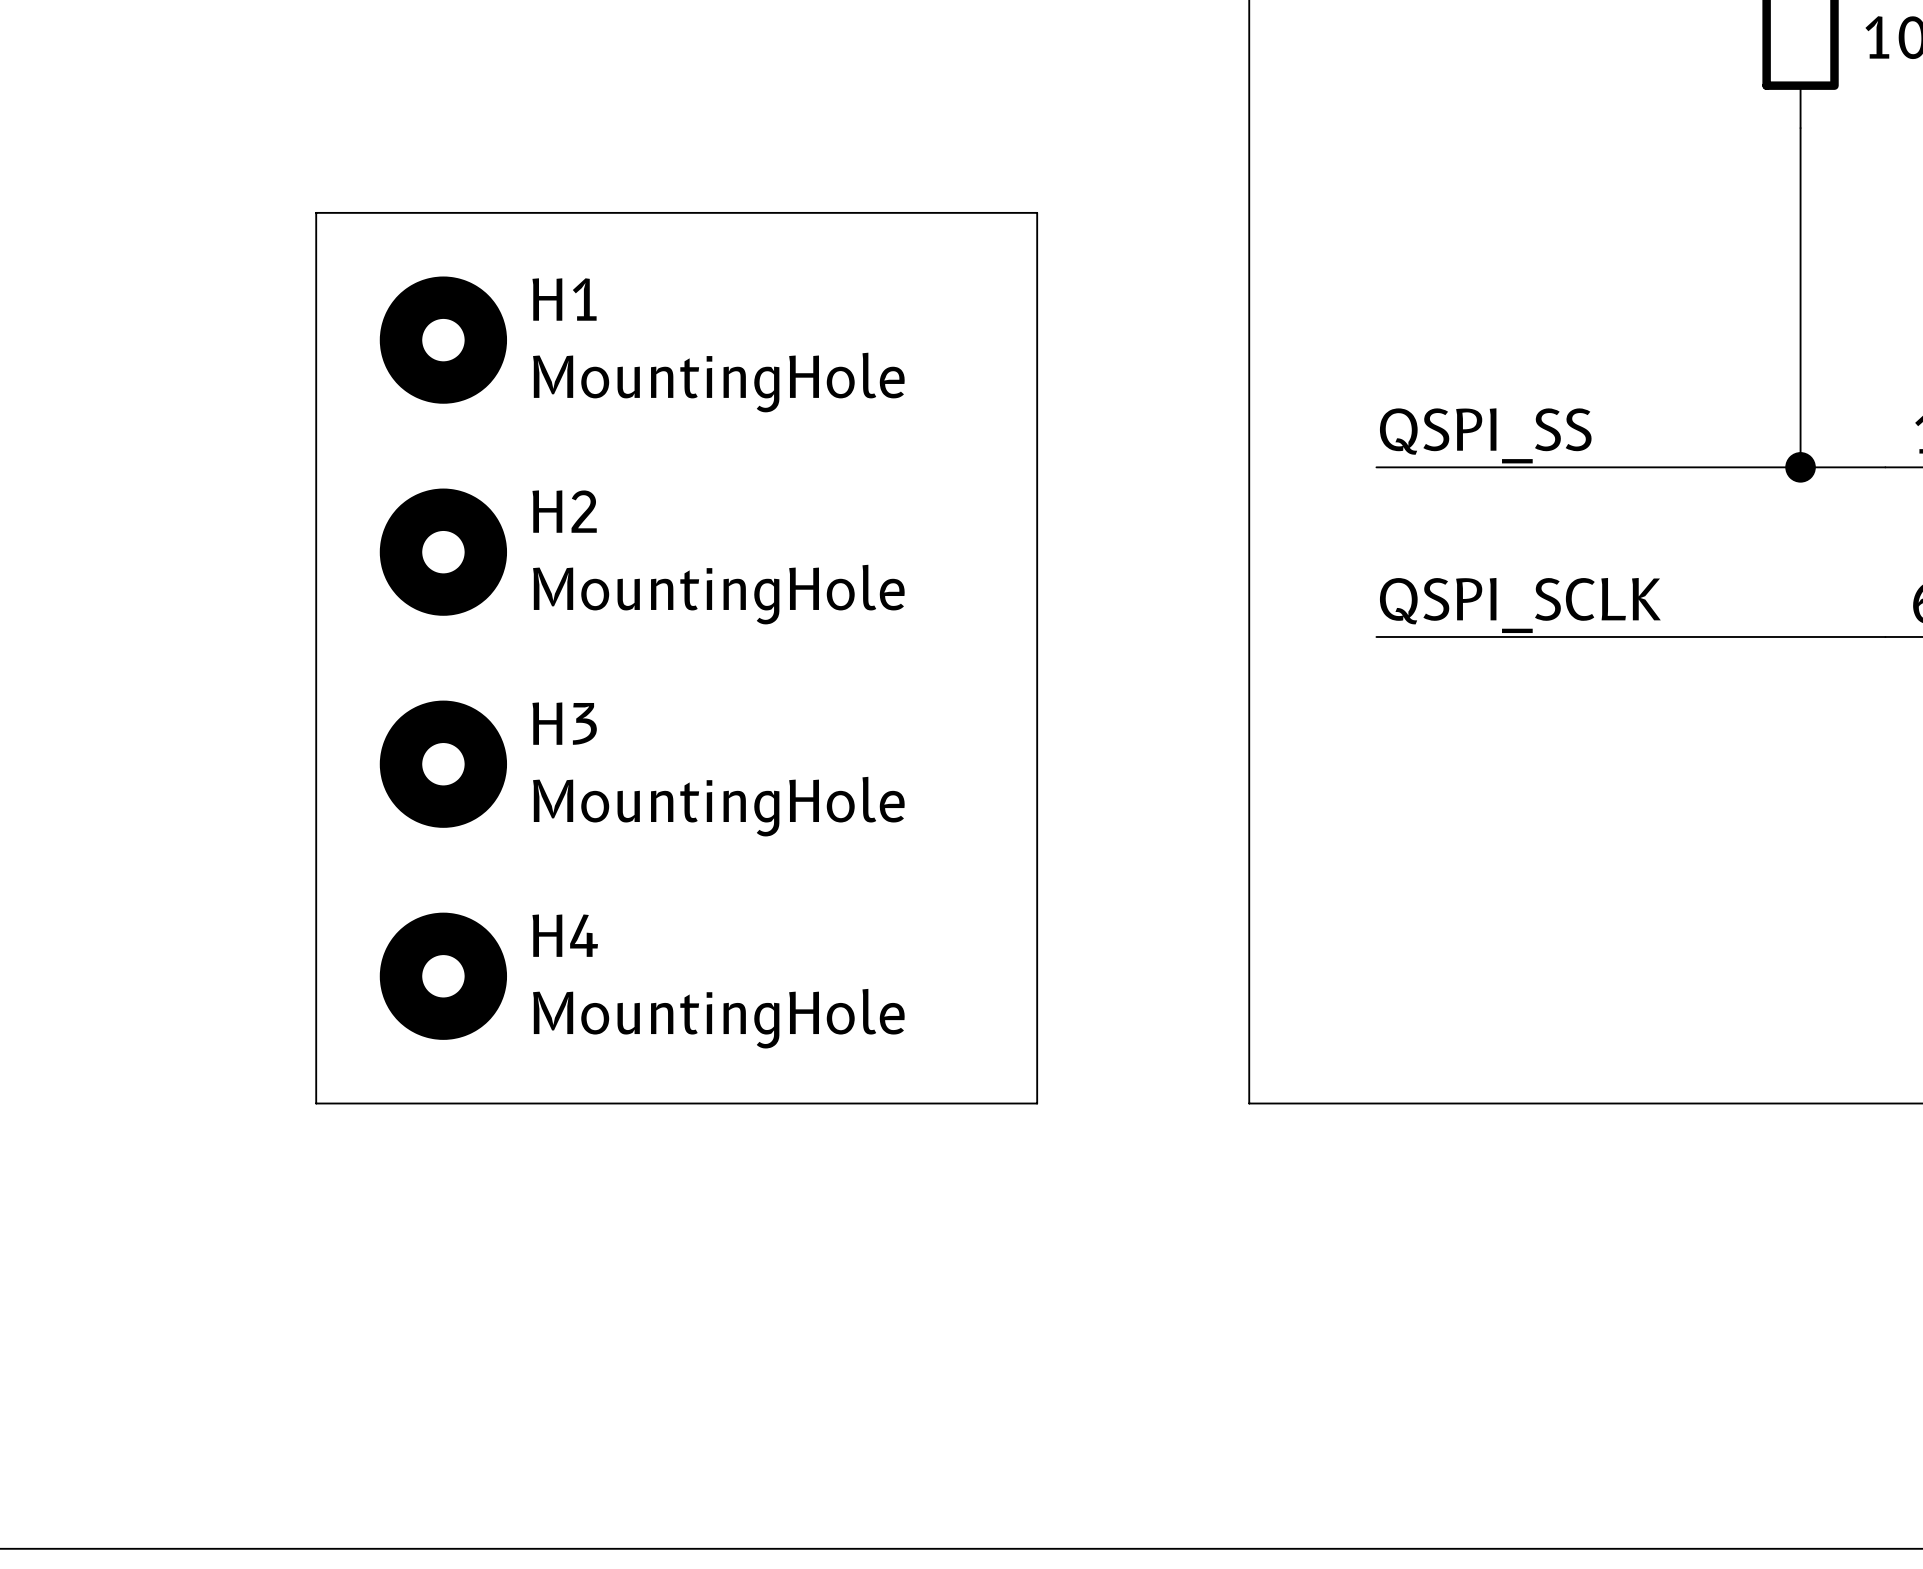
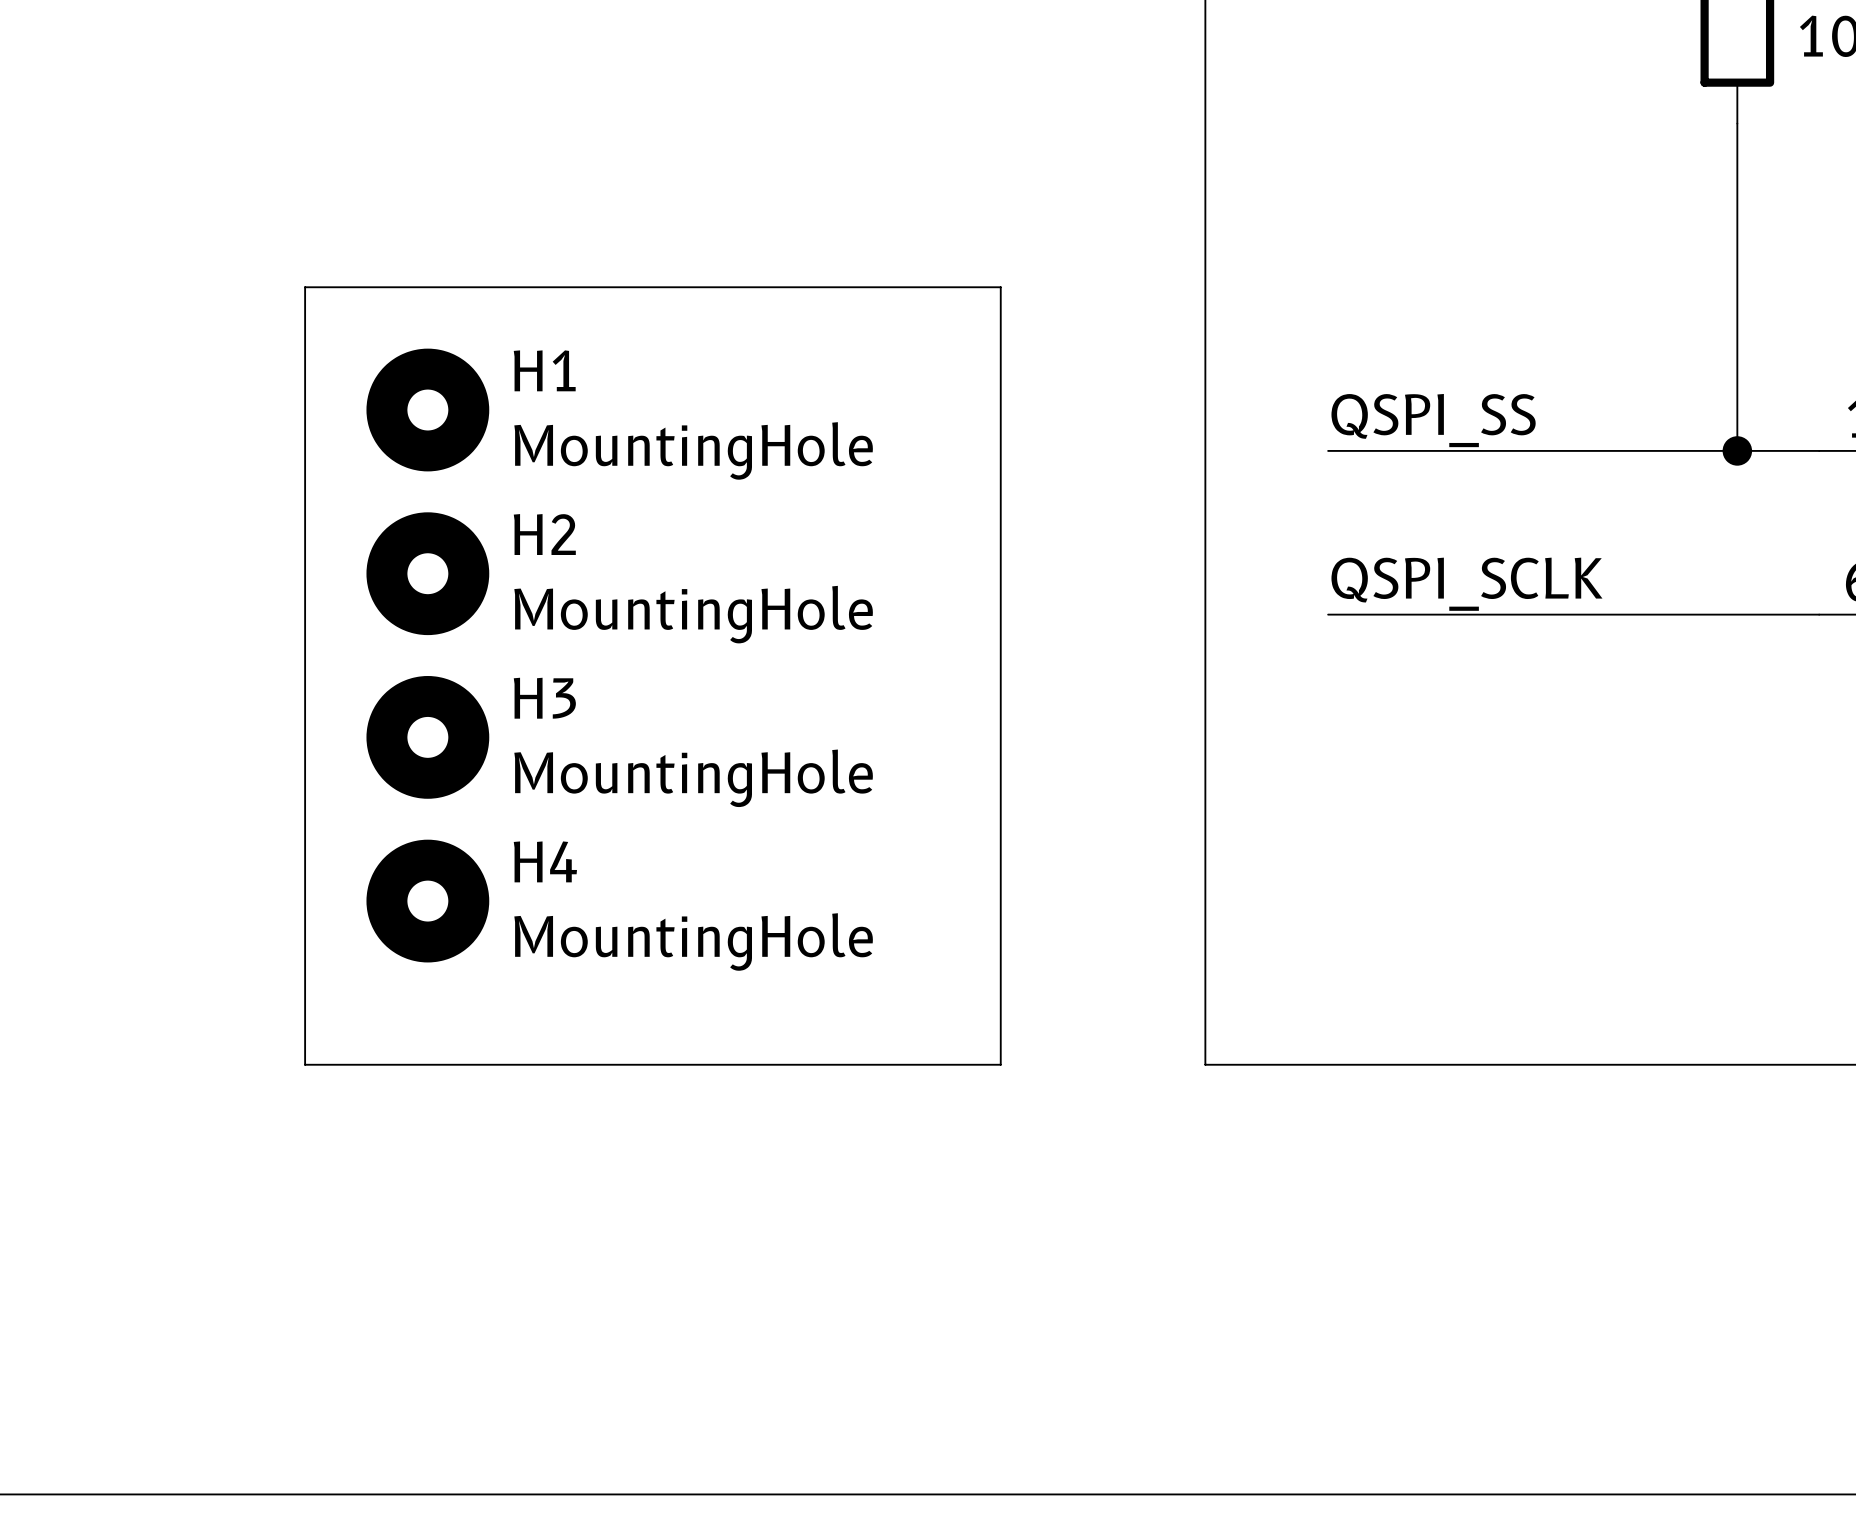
line: (316, 297) (316, 212) (1037, 212) (1037, 297) -> (305, 287) (1000, 287)
H1 position: (443, 340) -> (427, 410)
H2 position: (443, 552) -> (427, 573)
H4 position: (443, 976) -> (427, 901)

